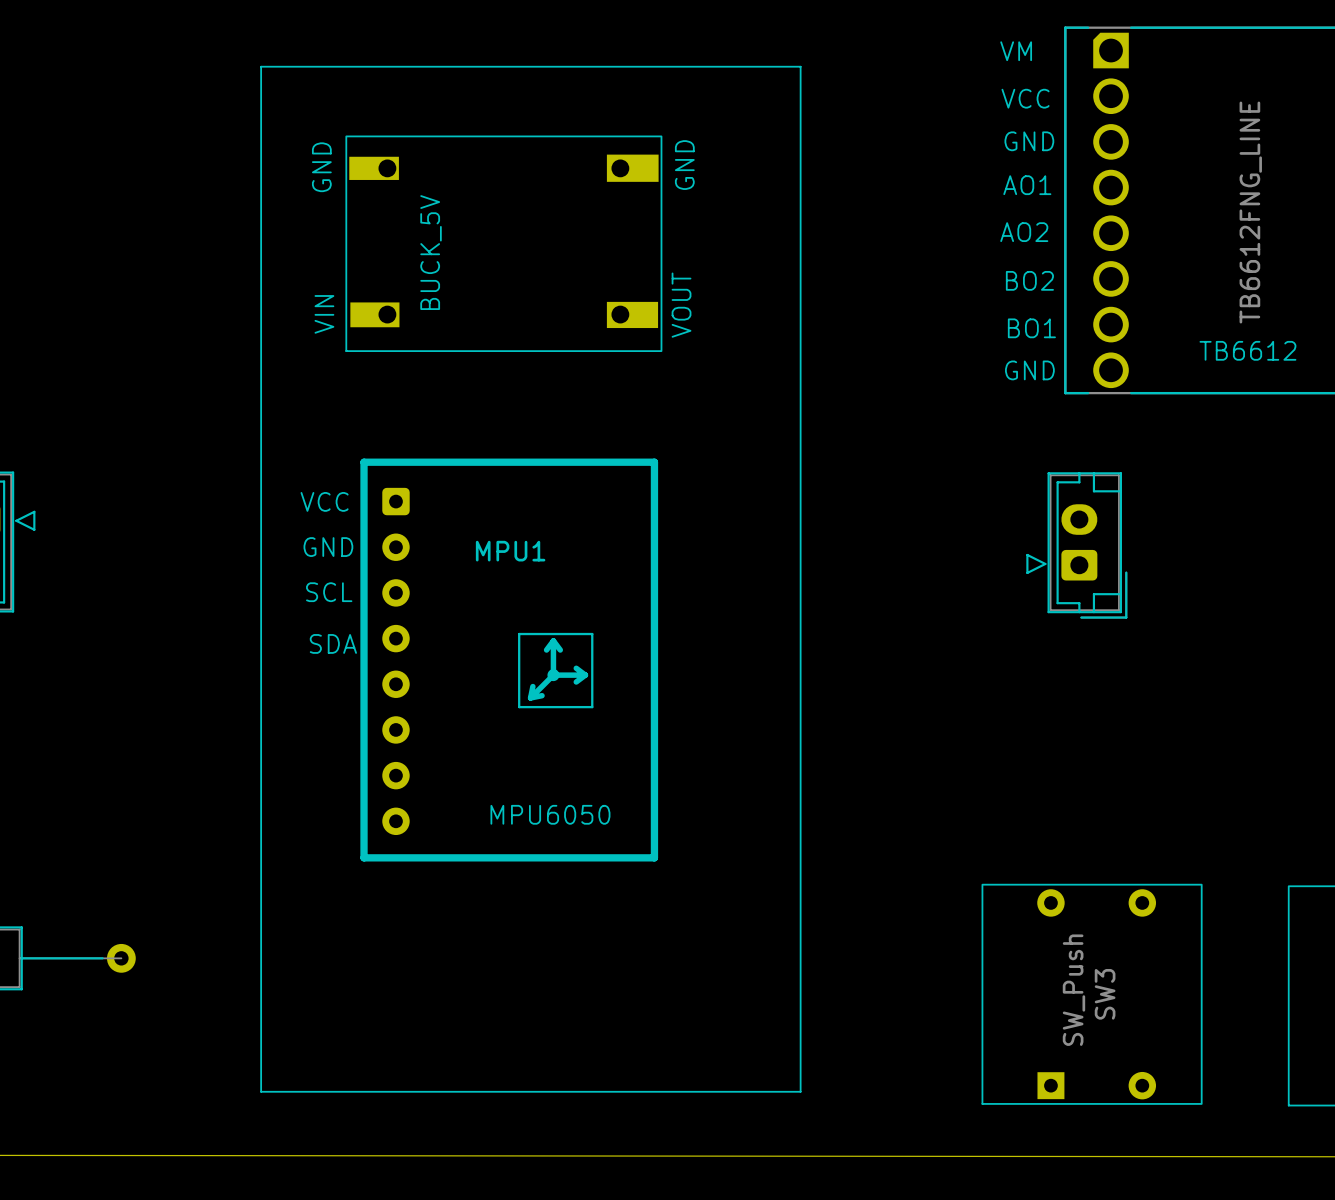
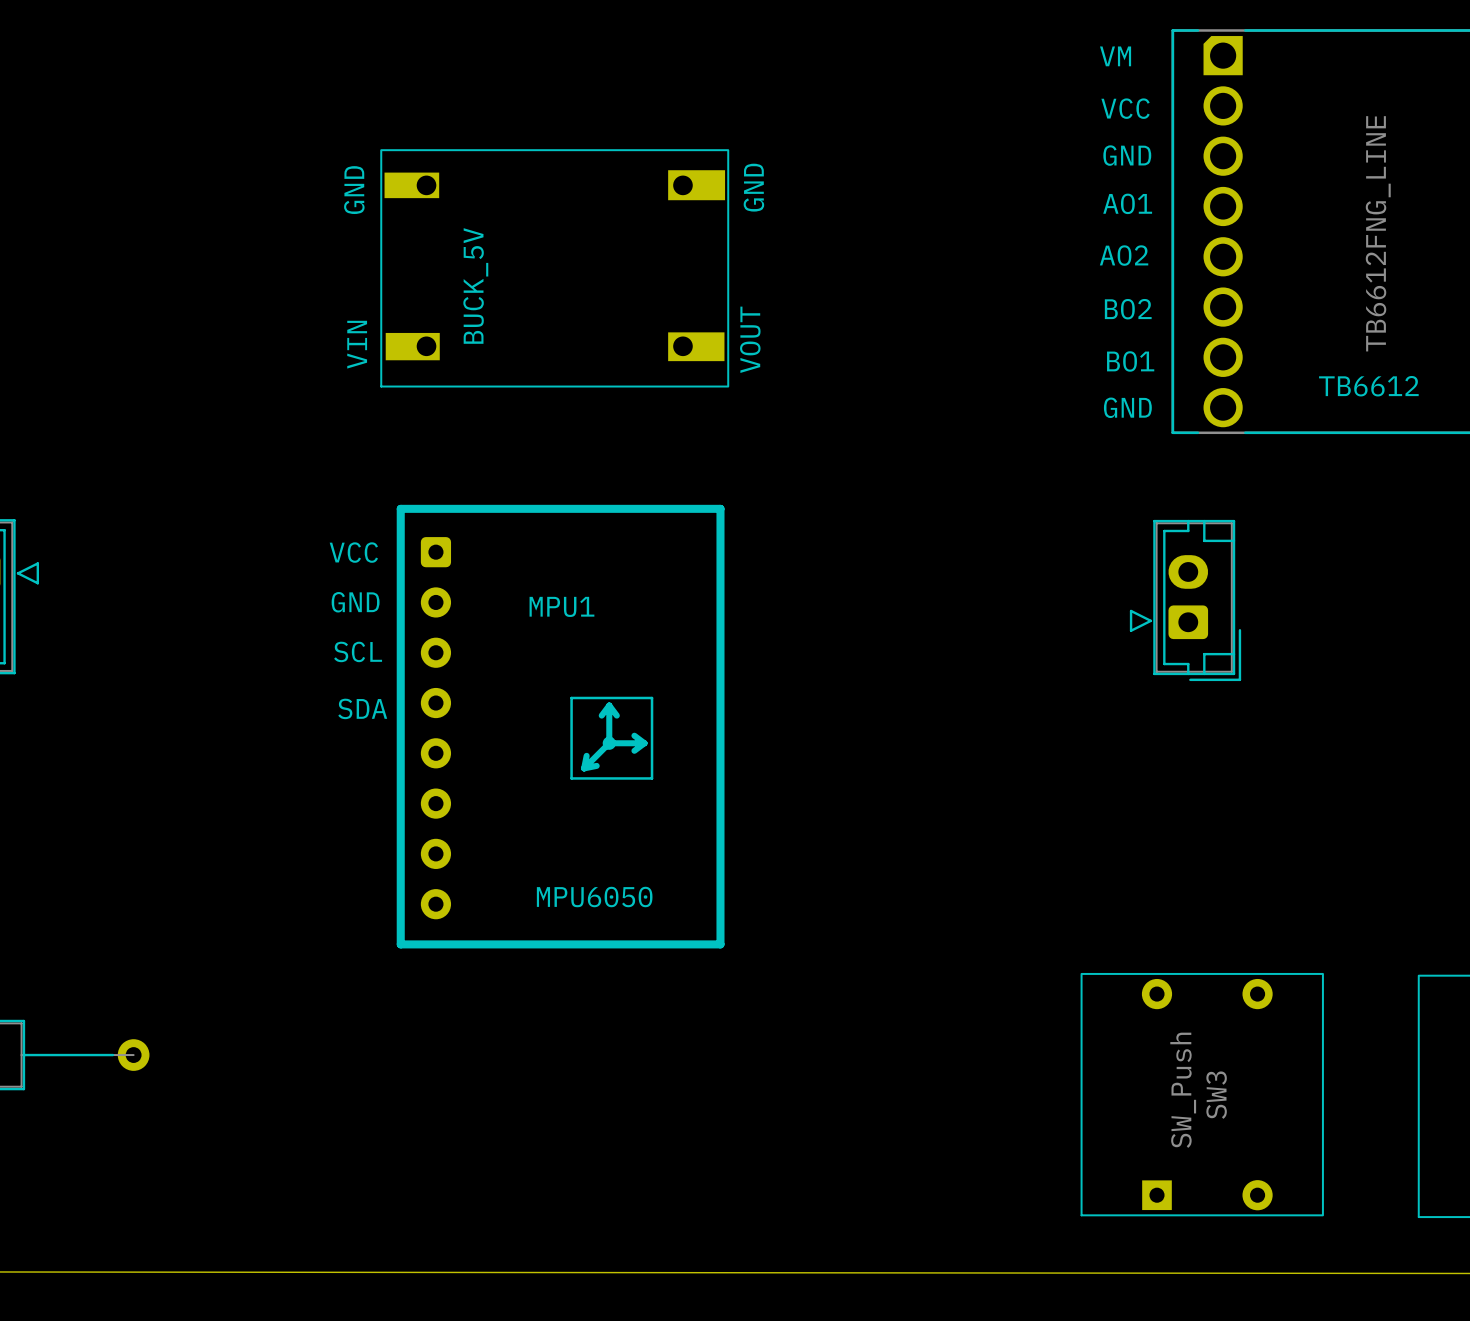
line: (261, 66) (800, 66) (800, 1091) (261, 1091) (261, 66) -> none

